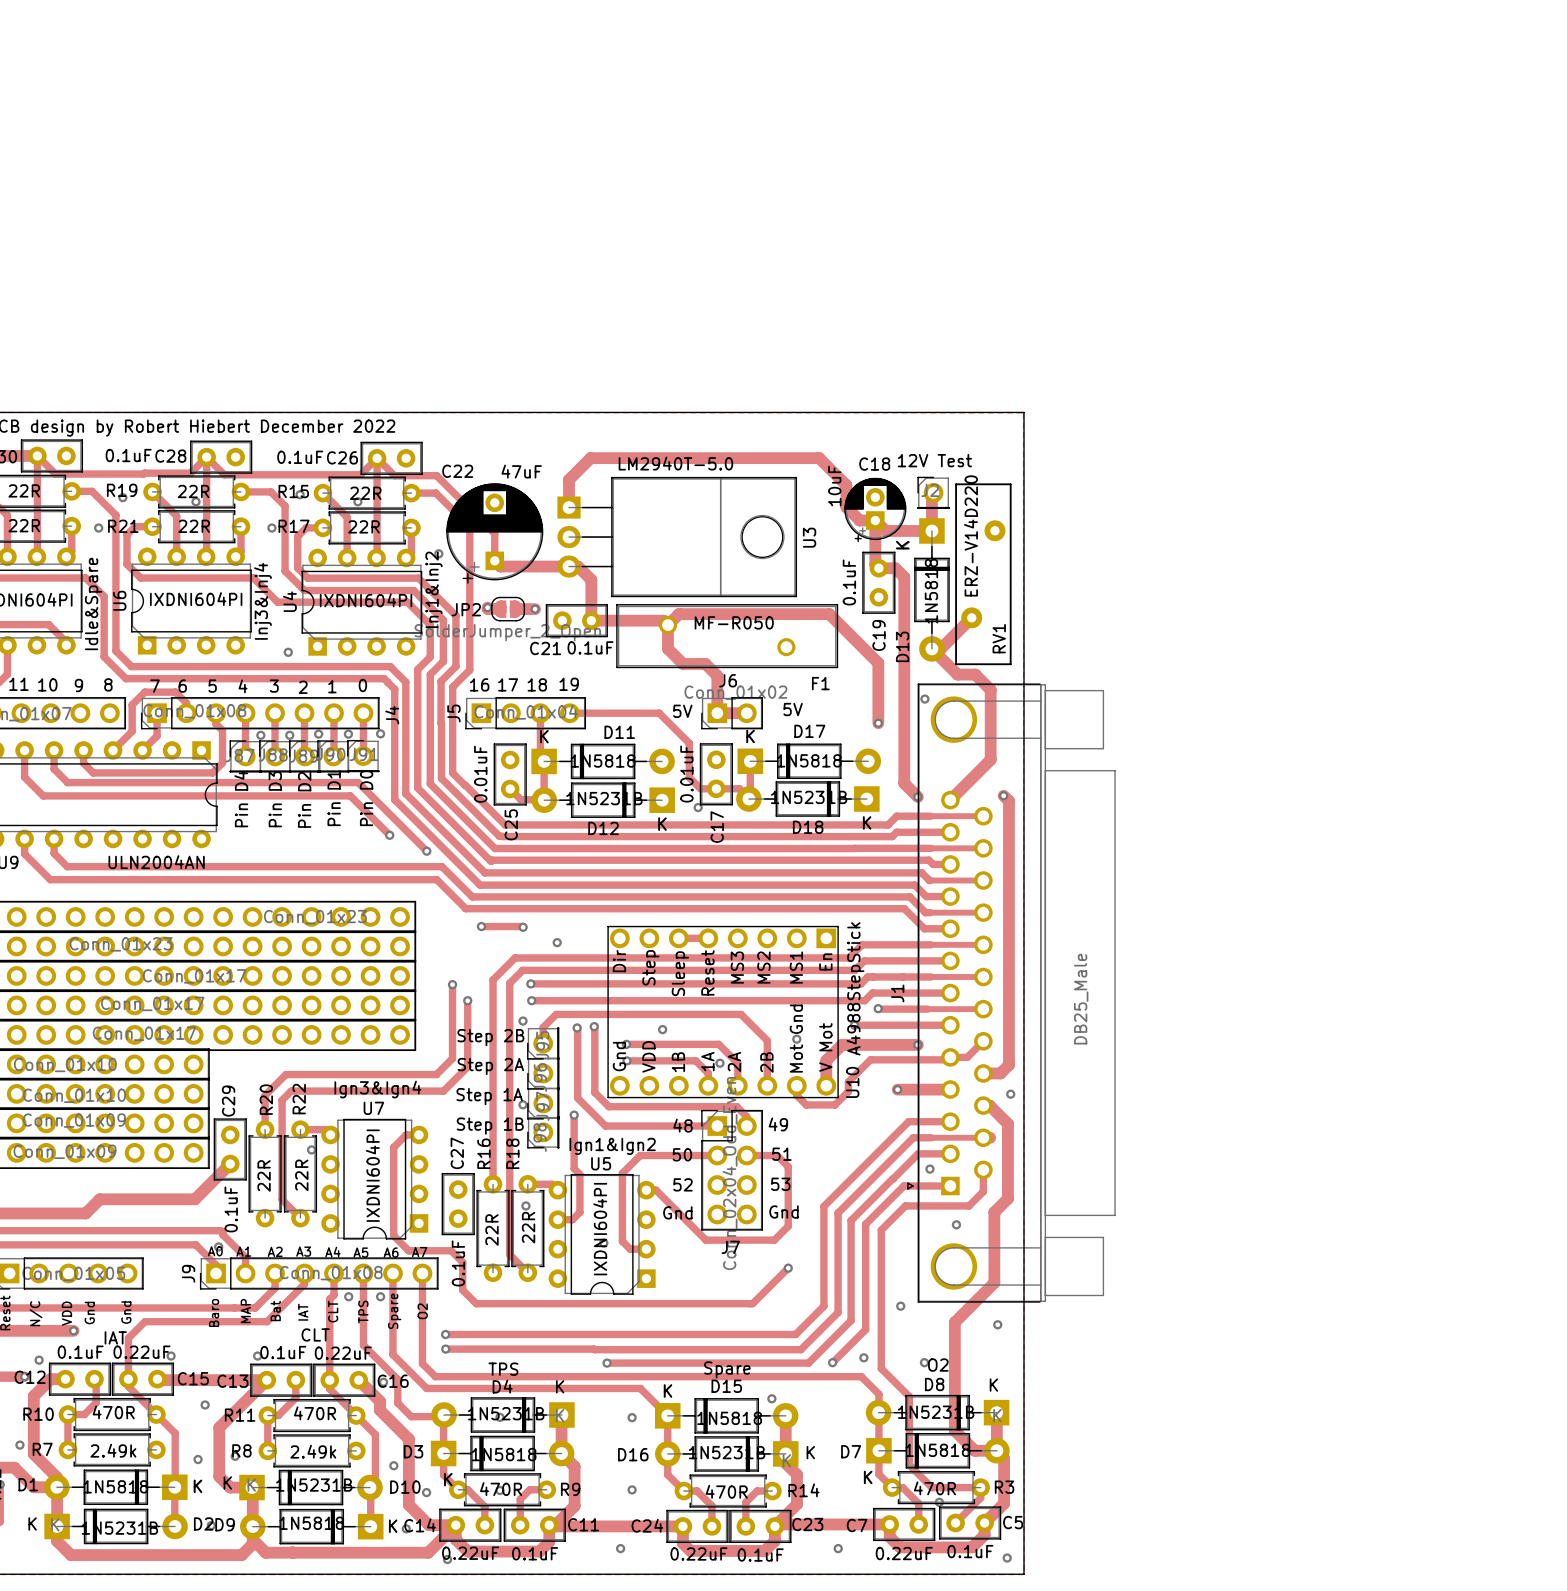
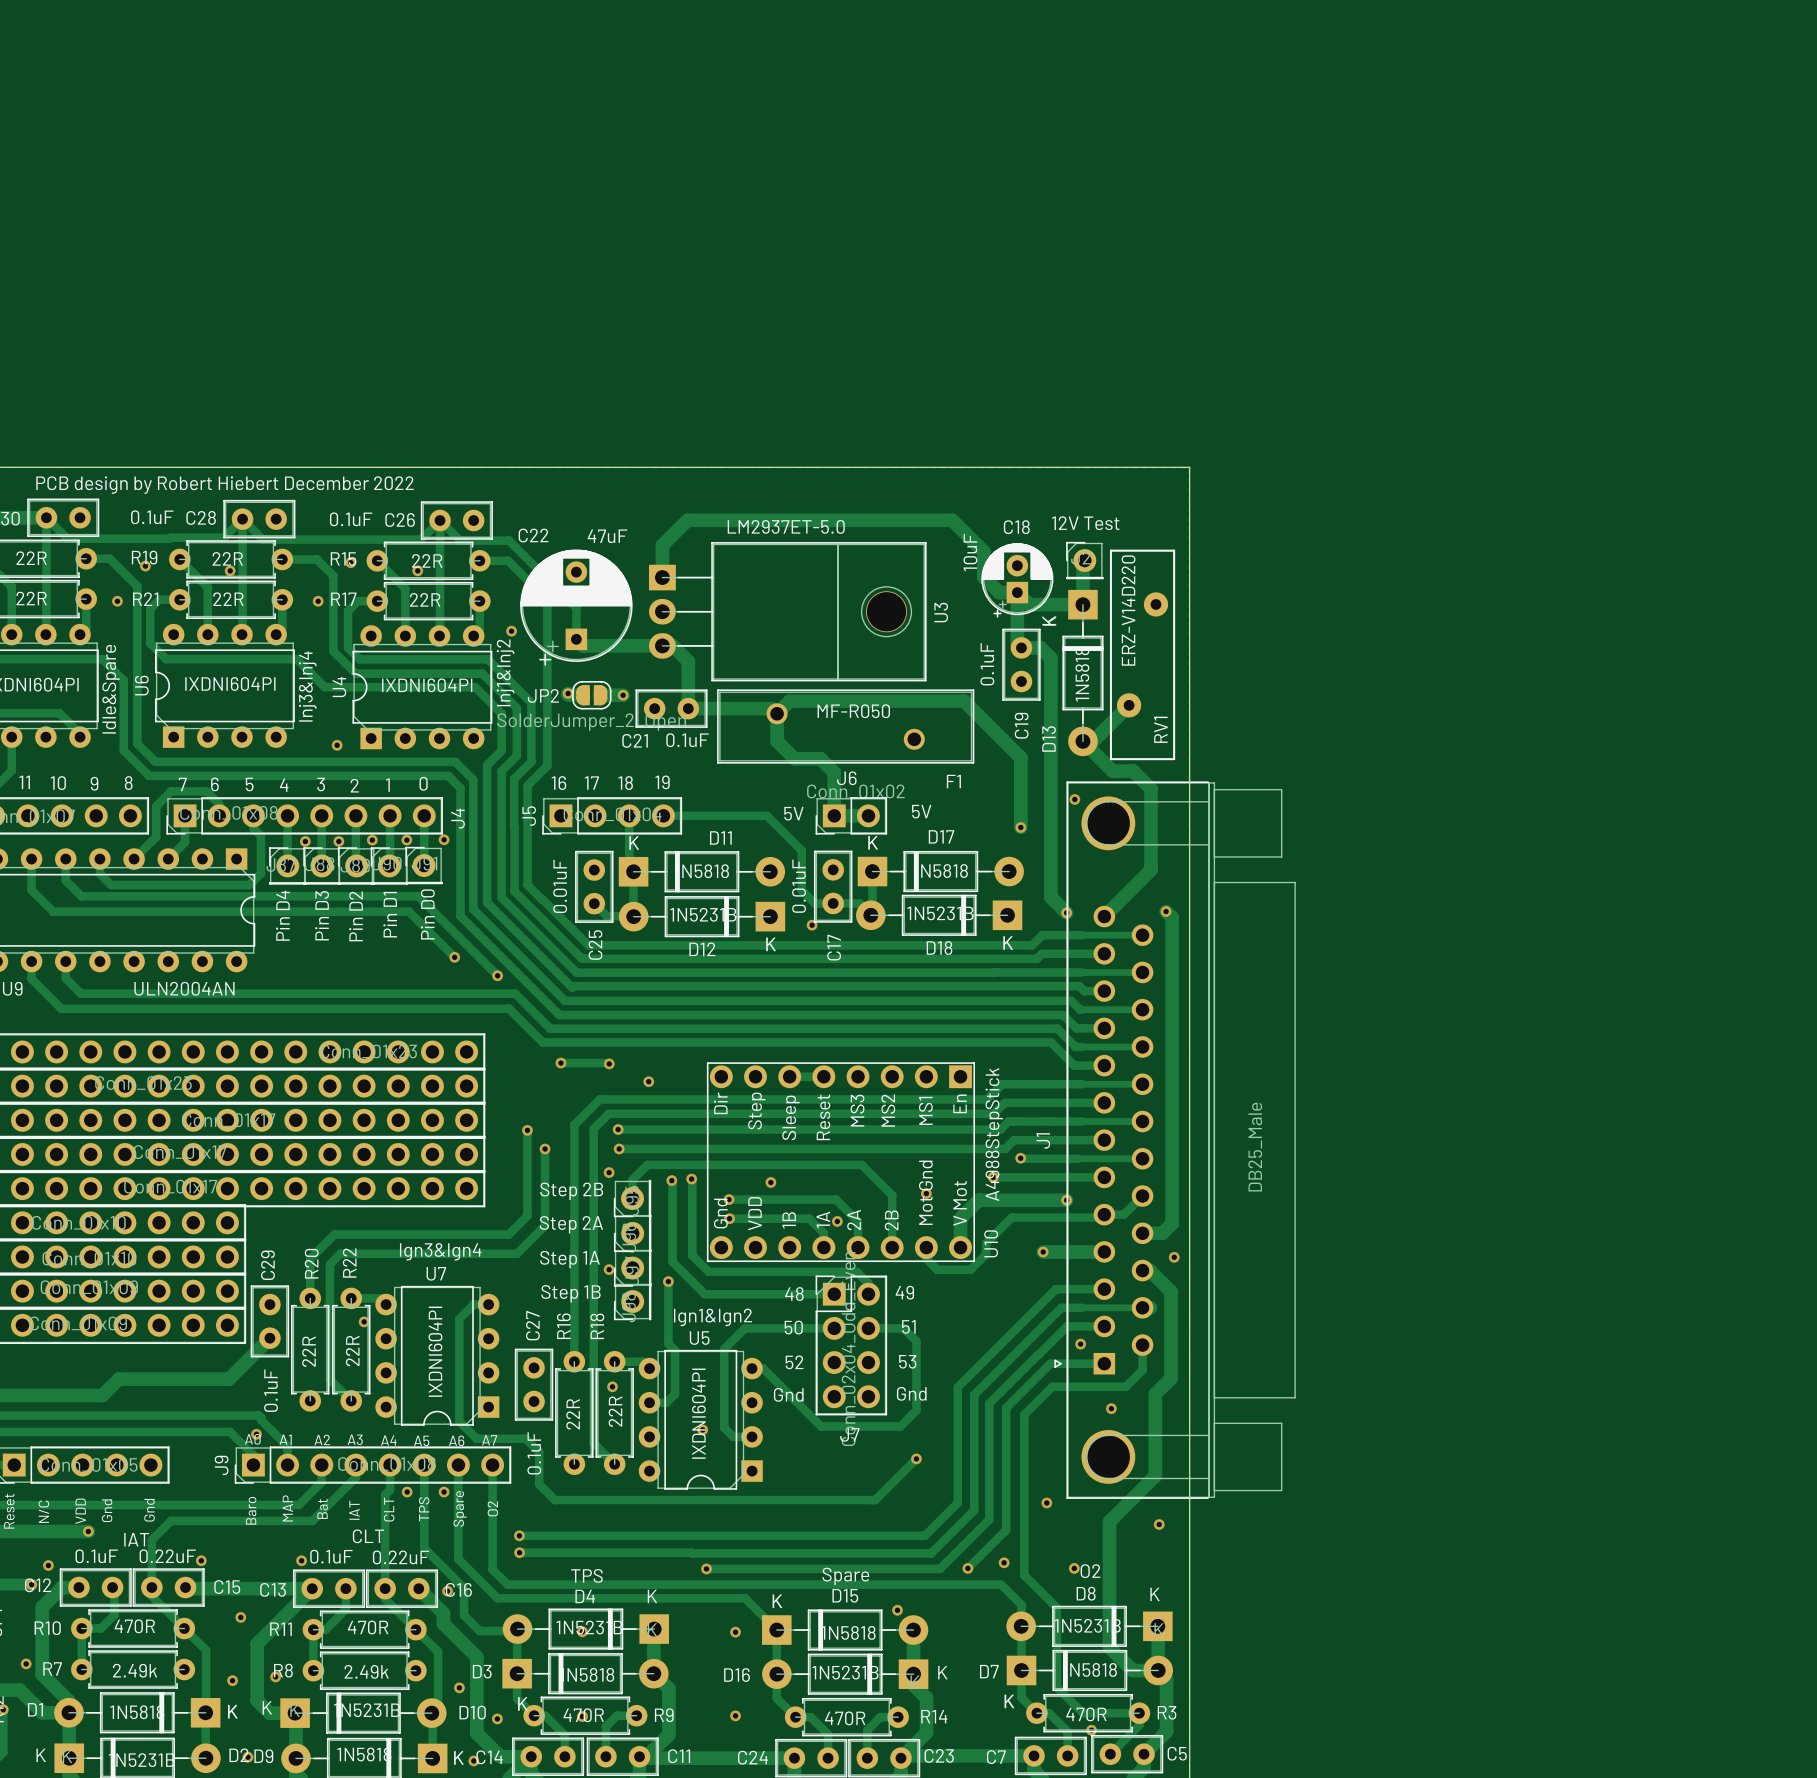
U3 value: LM2940T-5.0 (675, 463) -> LM2937ET-5.0 (786, 526)
U3 footprint: [557, 476, 798, 598] -> [648, 542, 927, 682]

